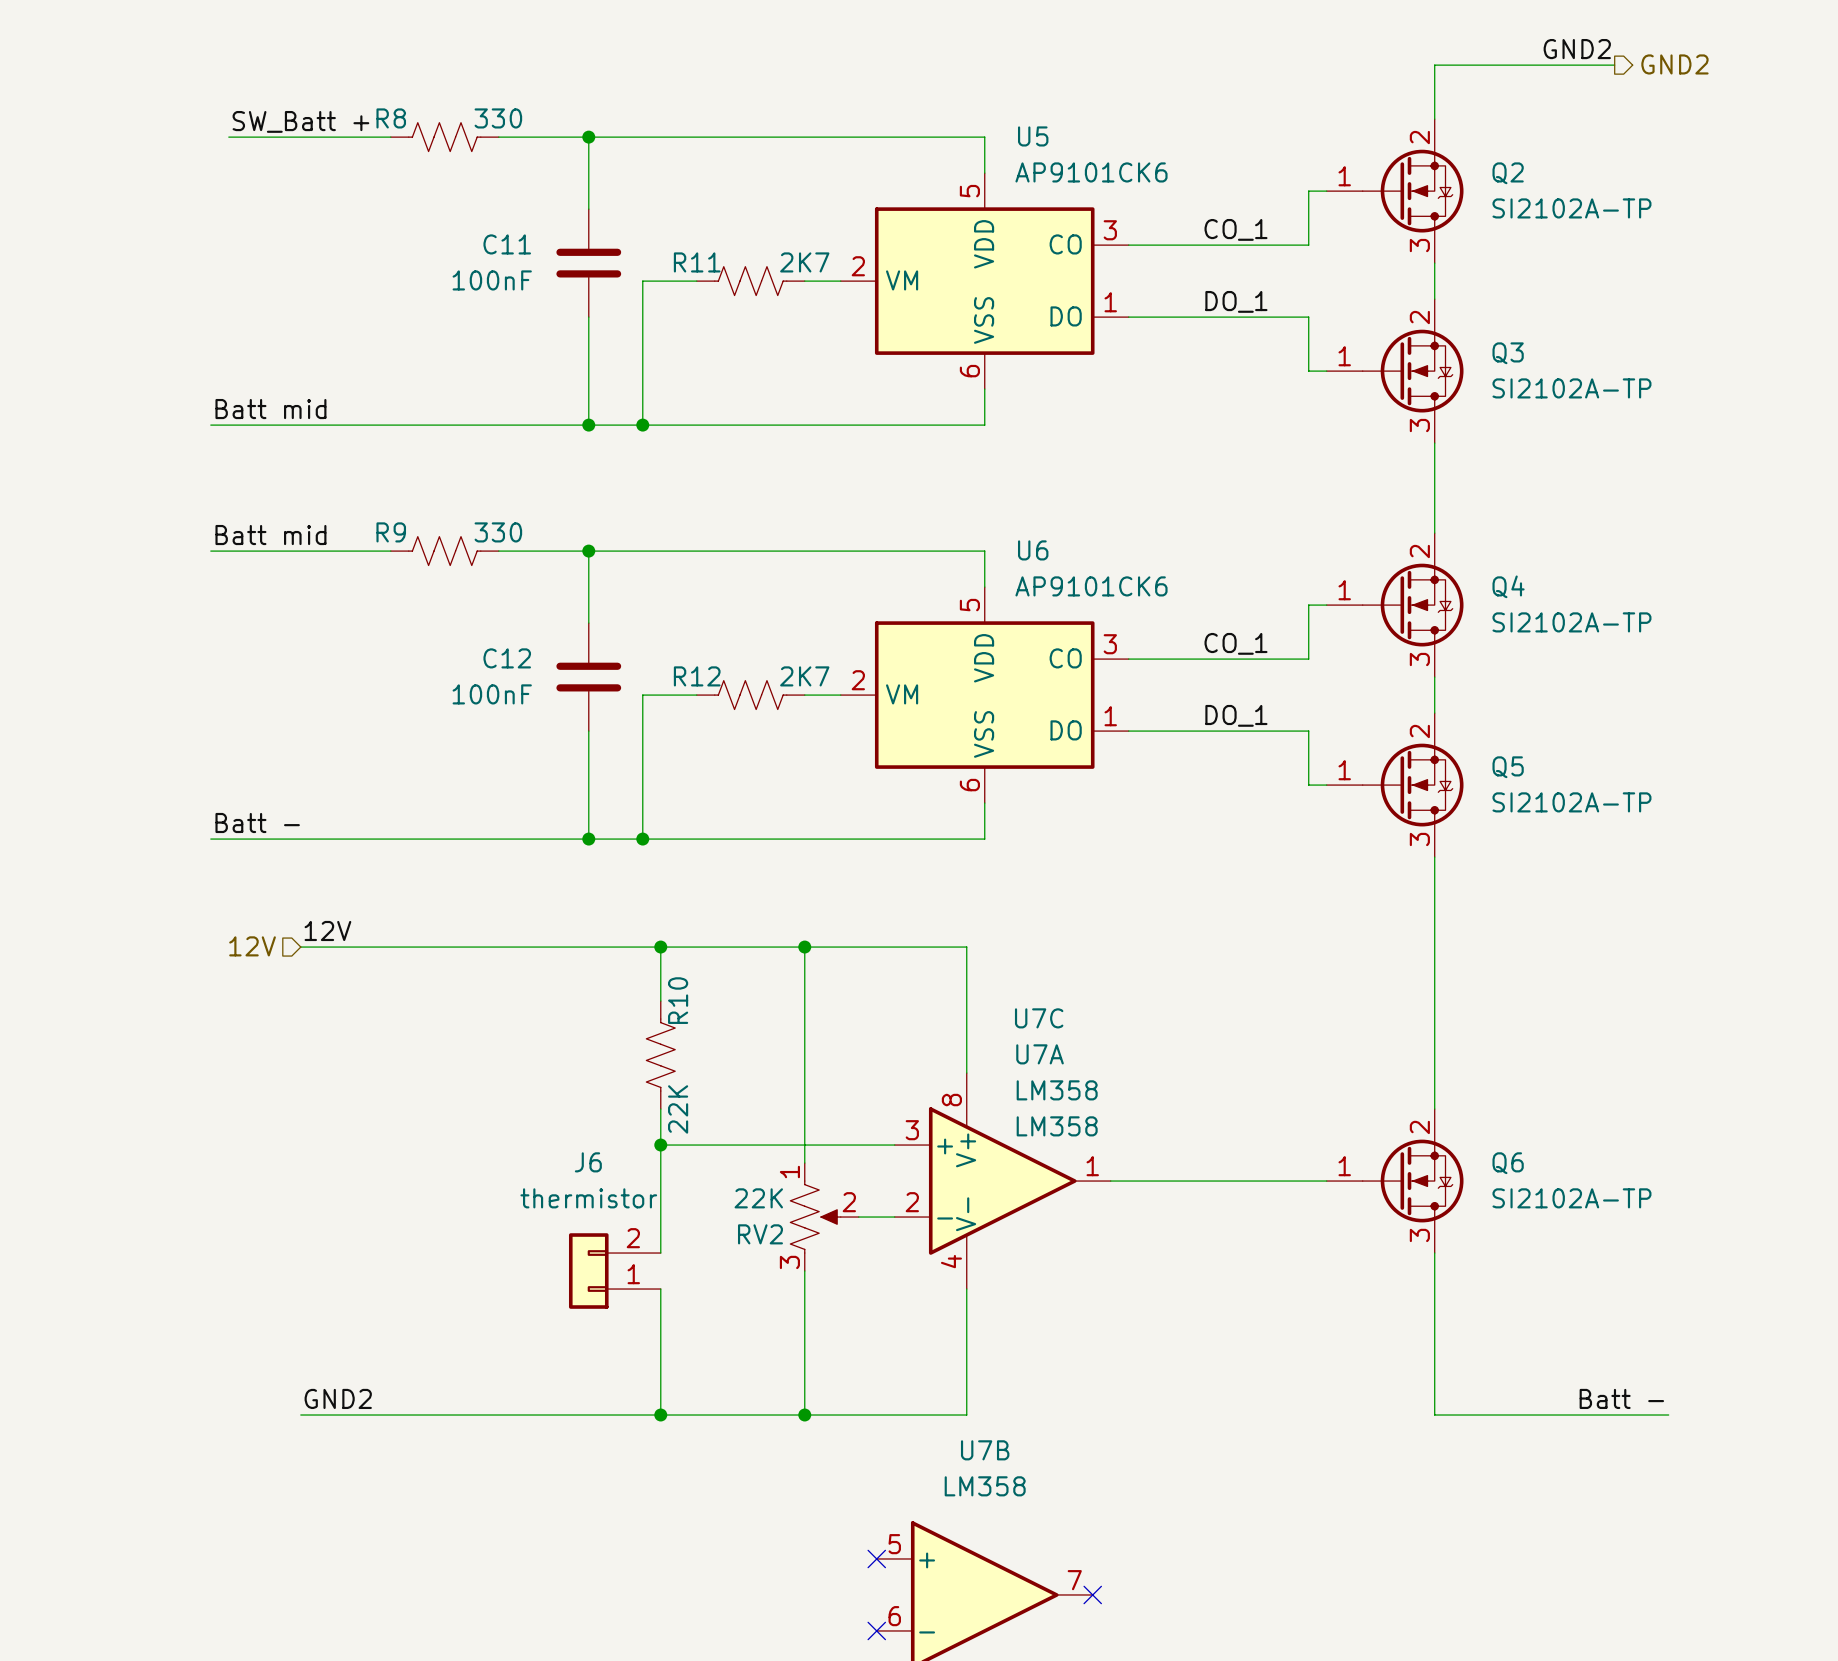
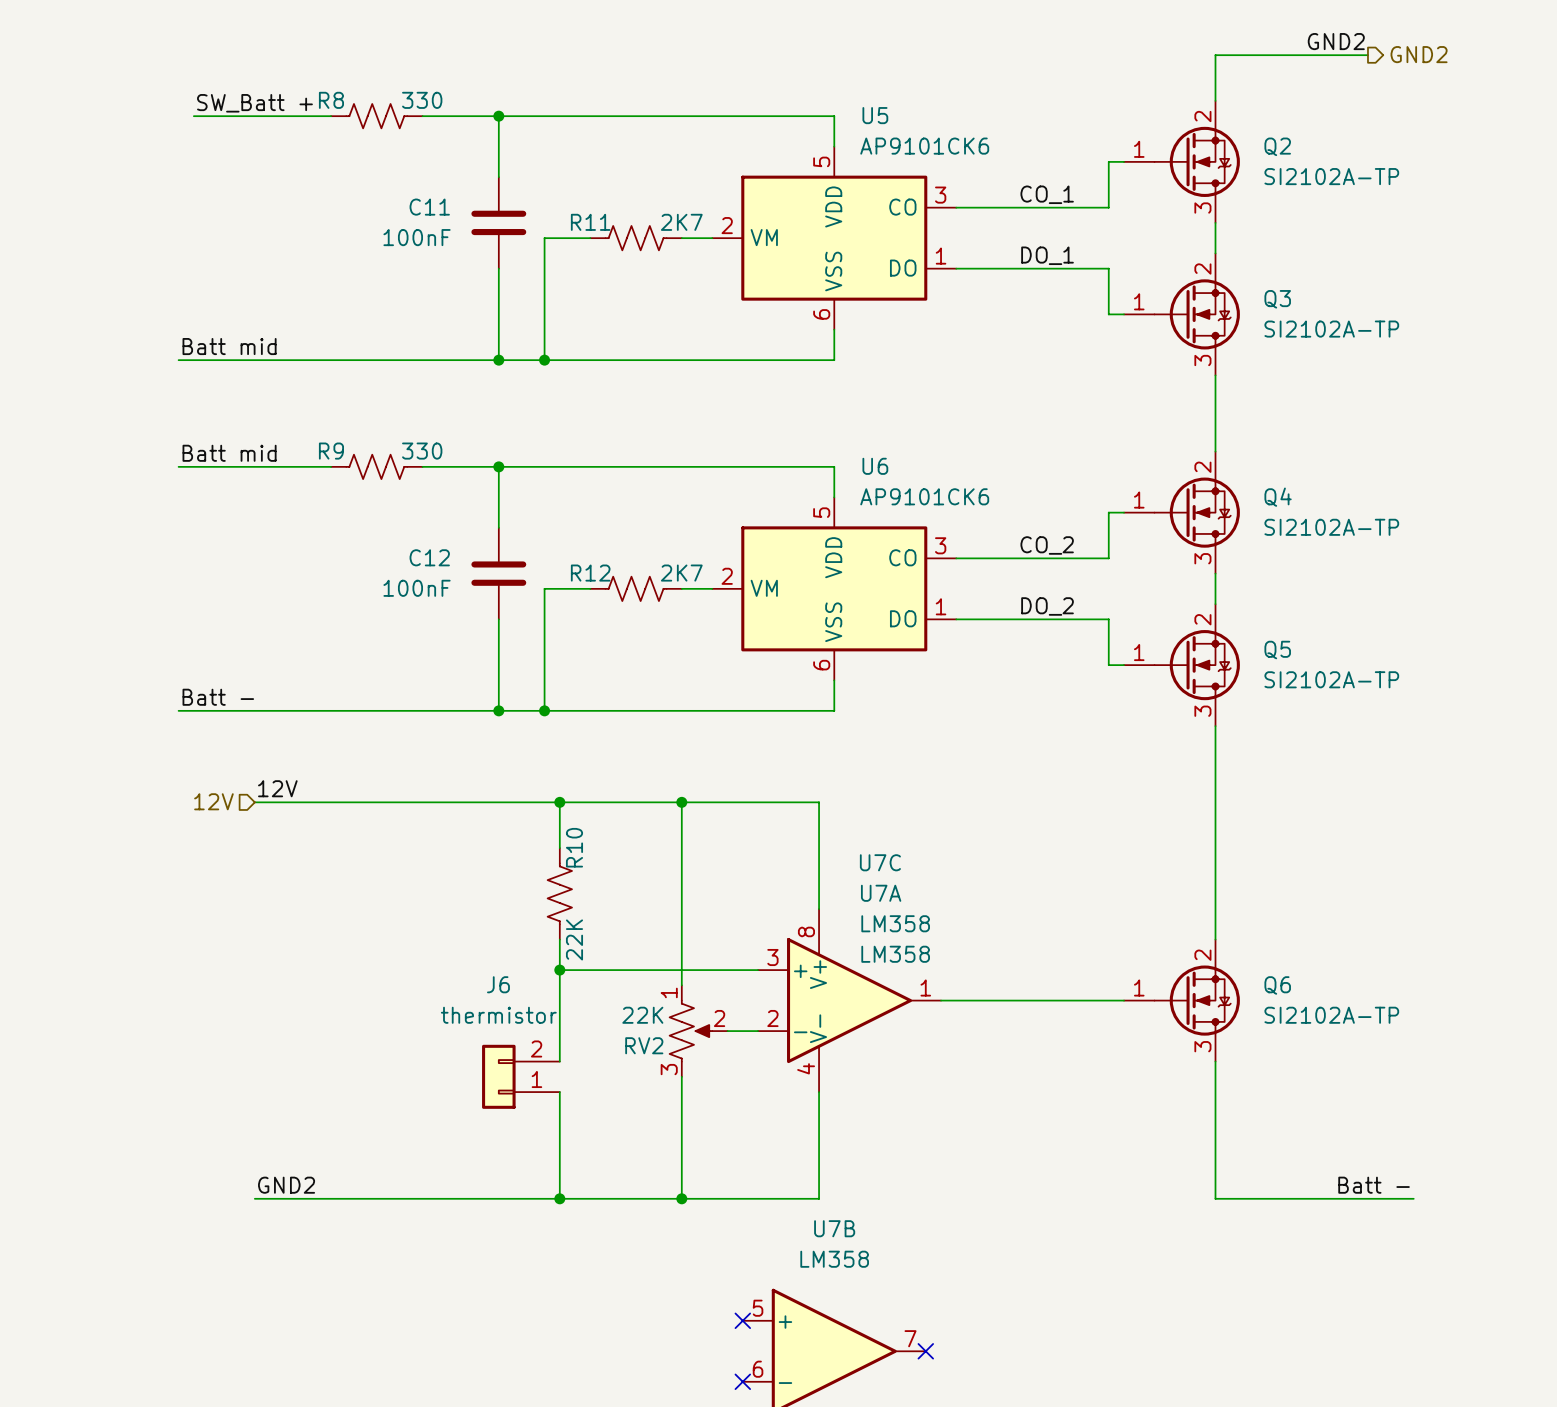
label: CO_1 (1236, 643) -> CO_2 (1047, 545)
label: DO_1 (1236, 715) -> DO_2 (1047, 606)

